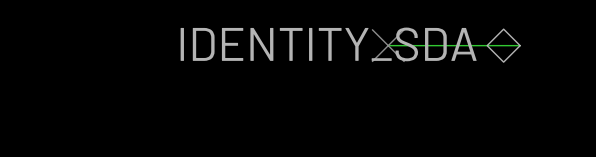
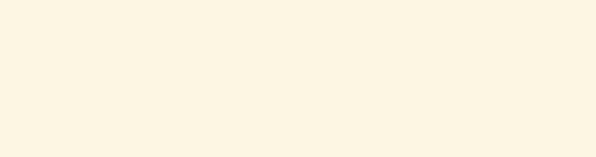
hierarchical label: IDENTITY_SDA (328, 44) -> none
wire: (388, 45) (520, 45) -> none
no-connect mark: (388, 45) -> none

